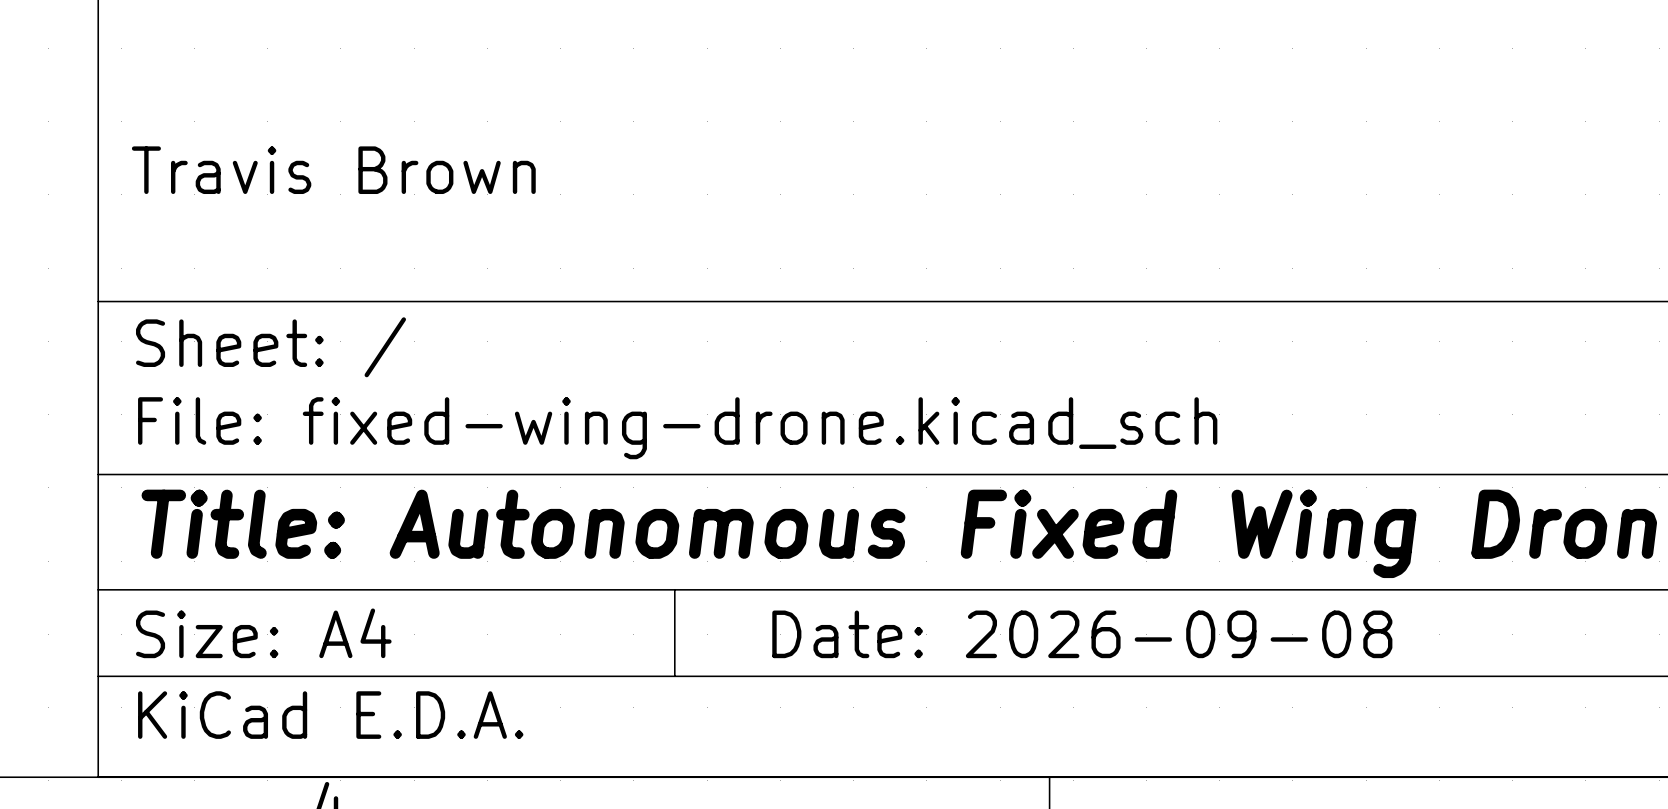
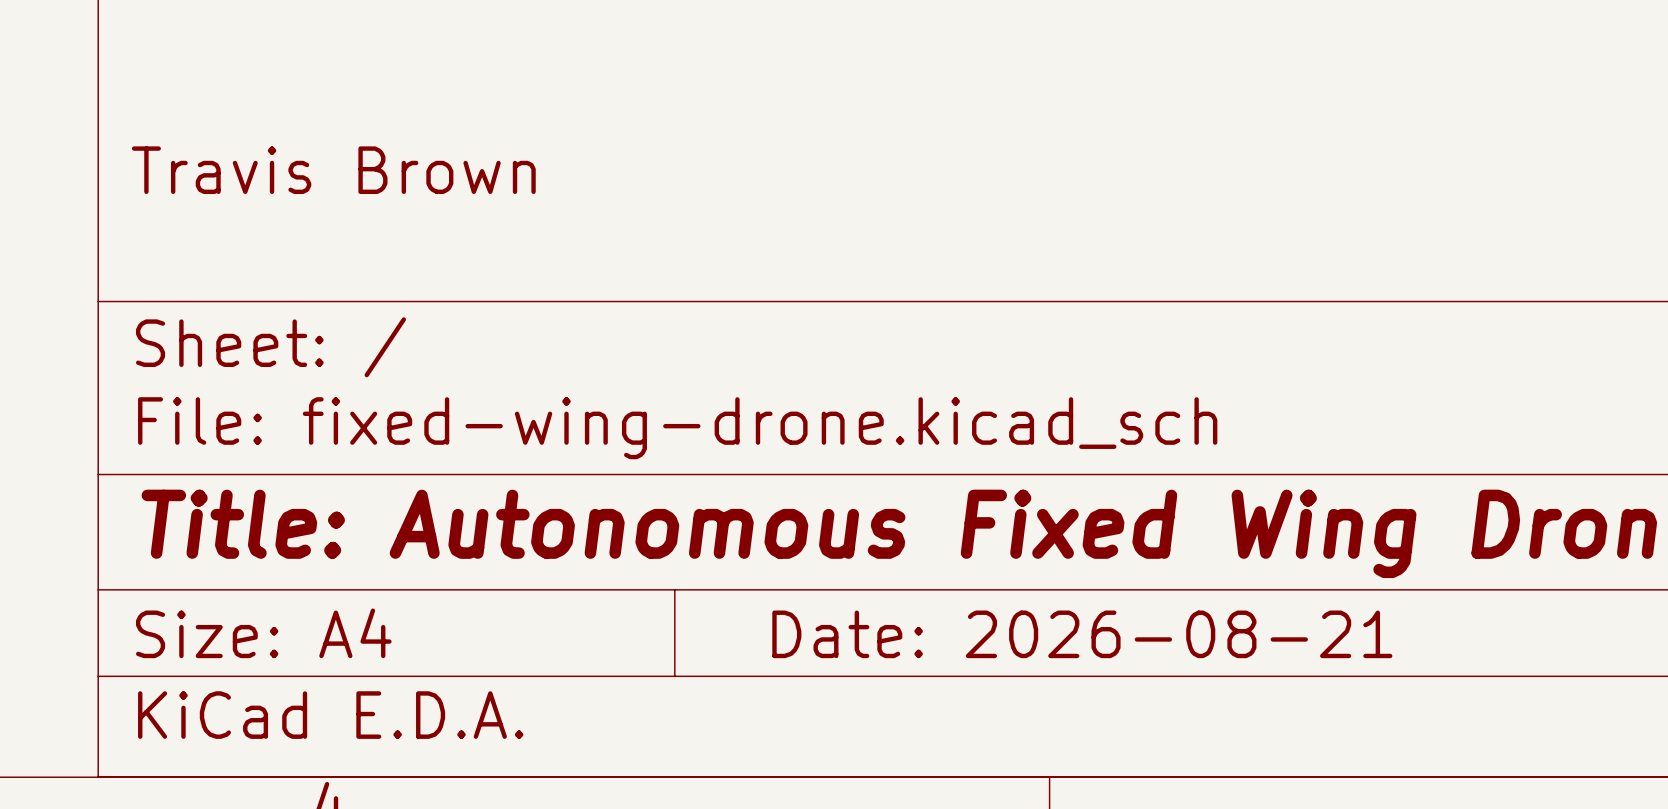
title block: Date: 2026-09-08 (1082, 634) -> Date: 2026-08-21 (1082, 634)

